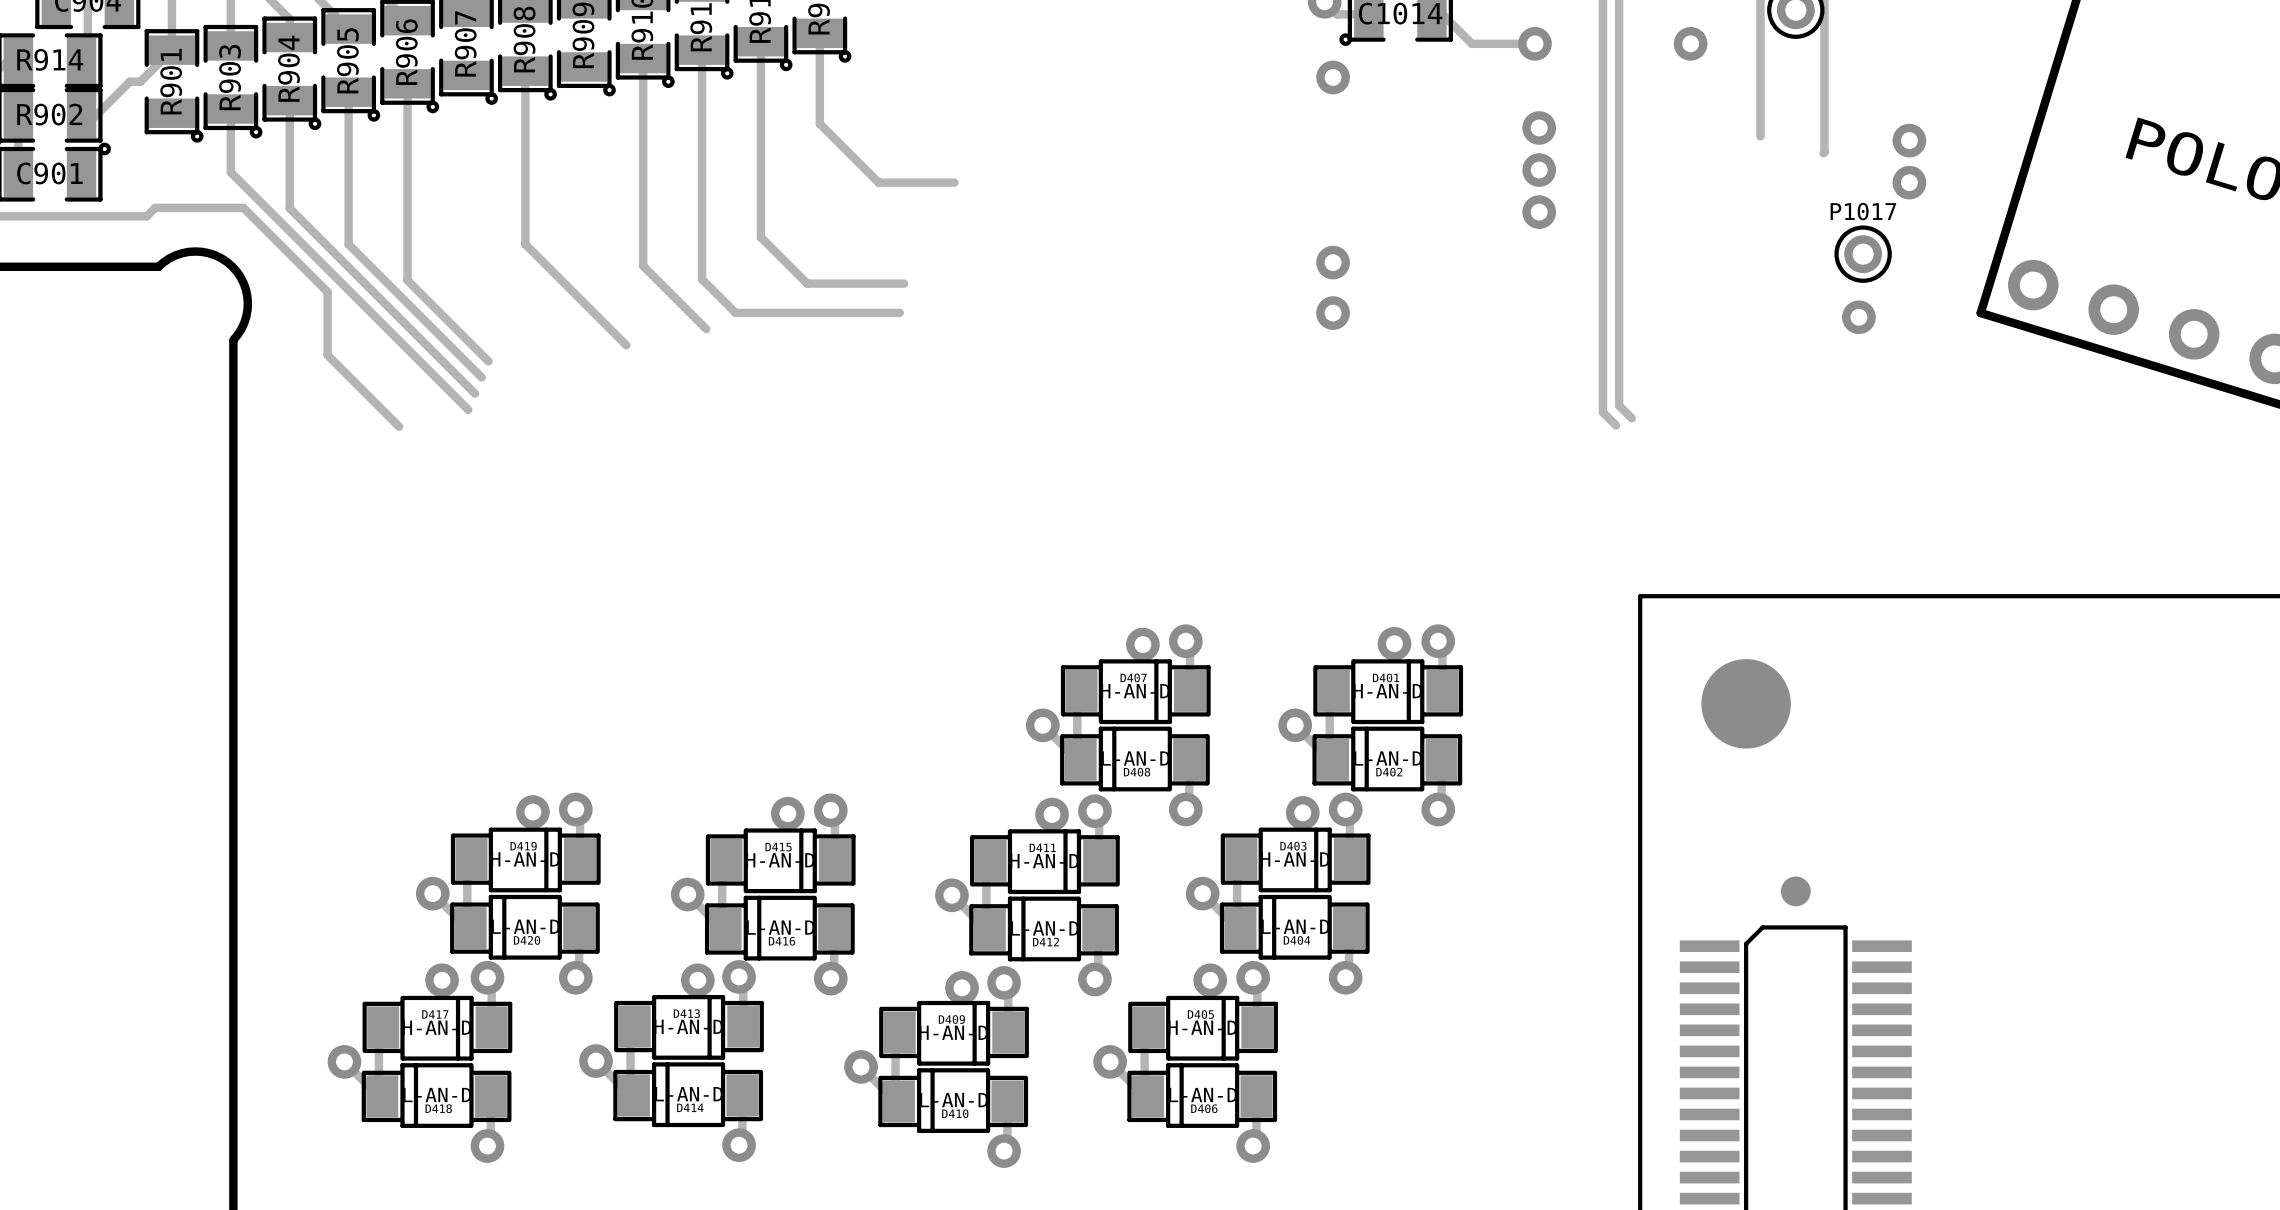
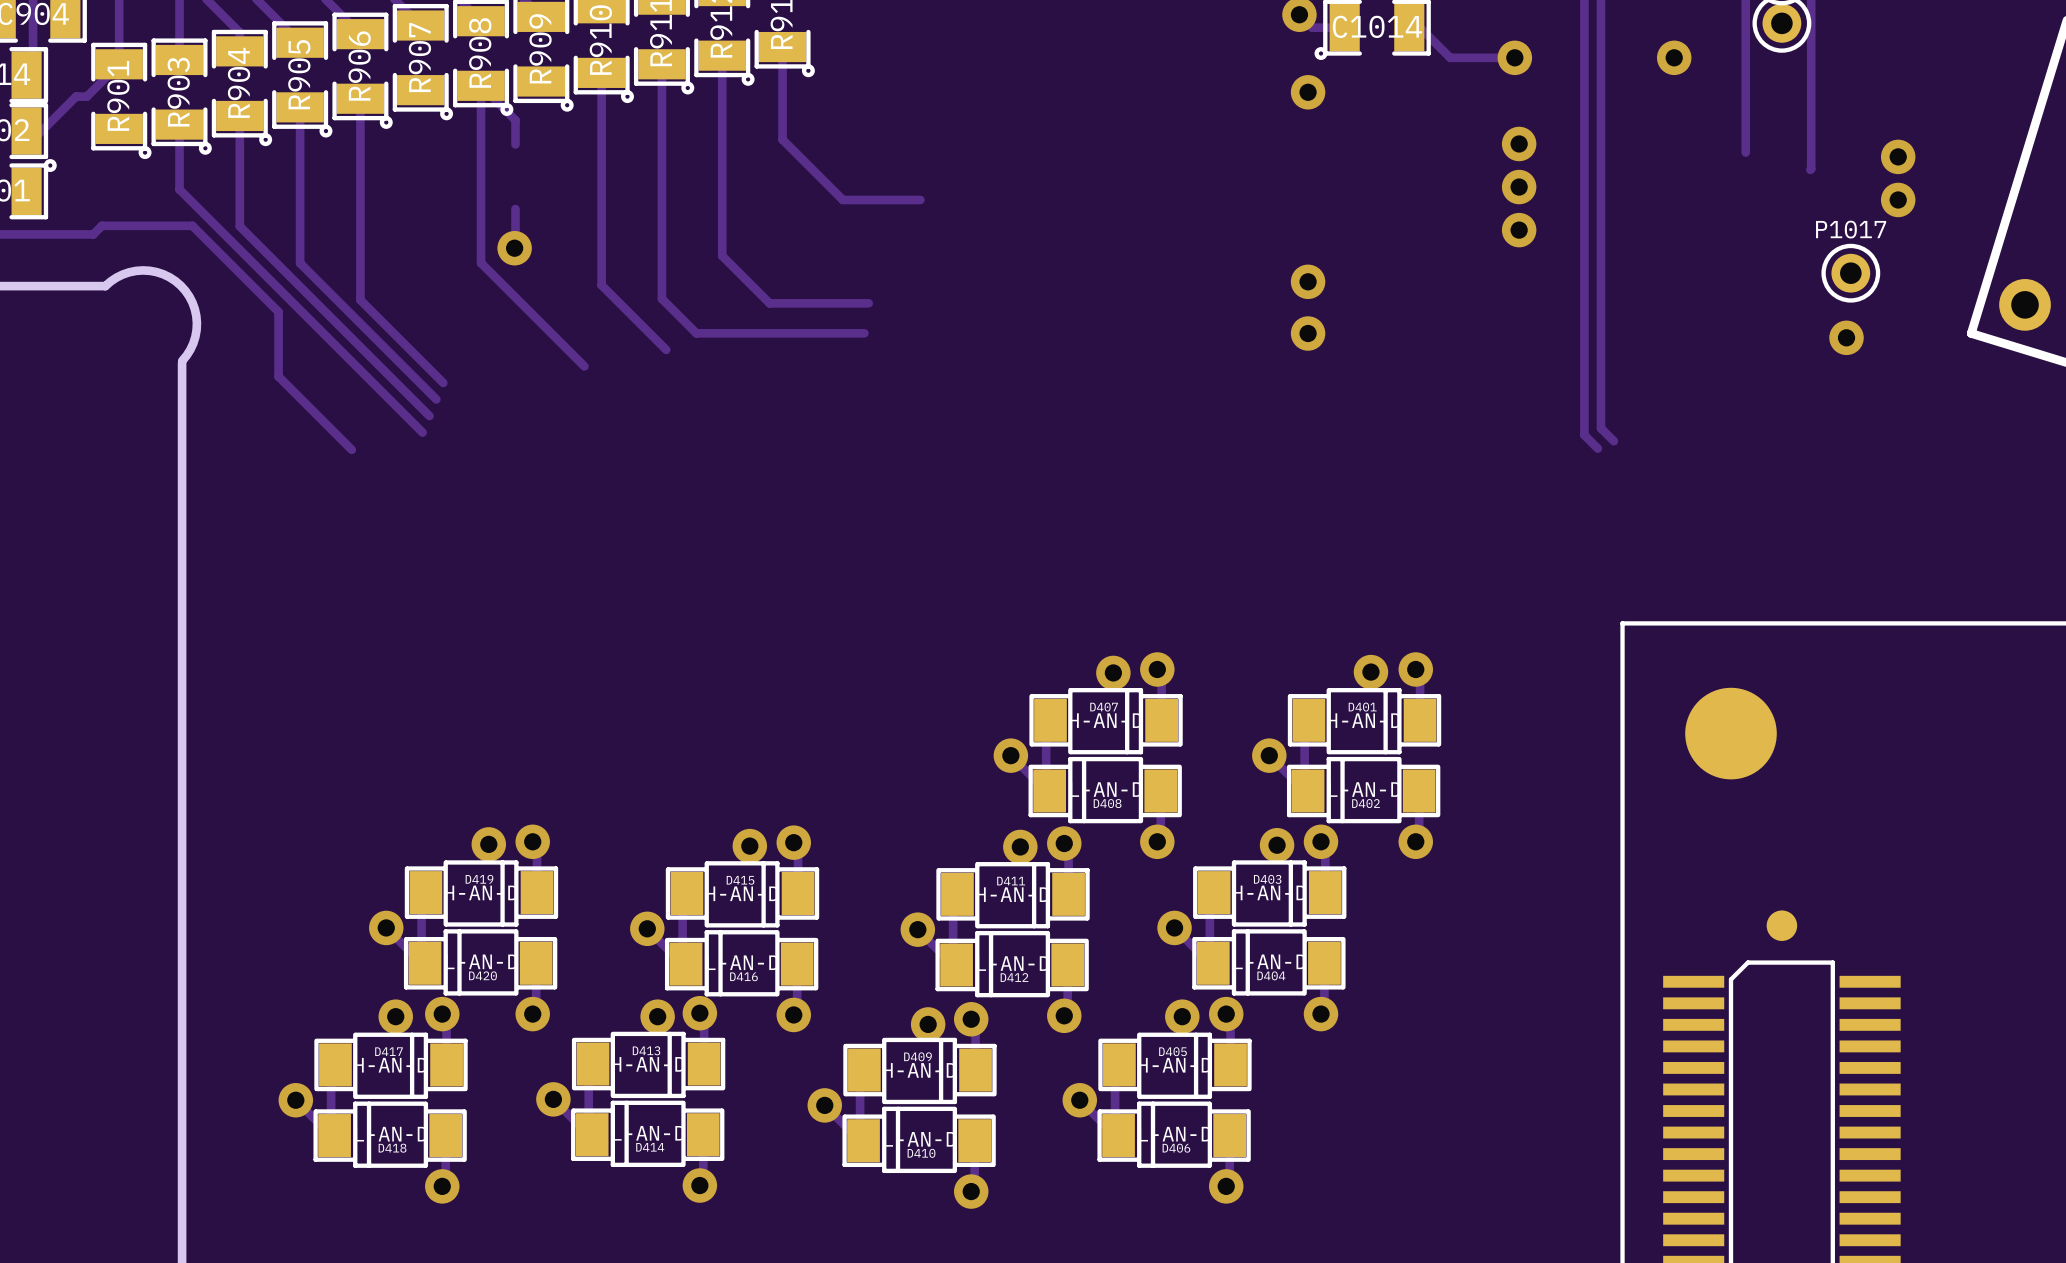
track: none -> (481, 85) (515, 120) (515, 144)
track: none -> (515, 209) (514, 248)
via: none -> (514, 248)

